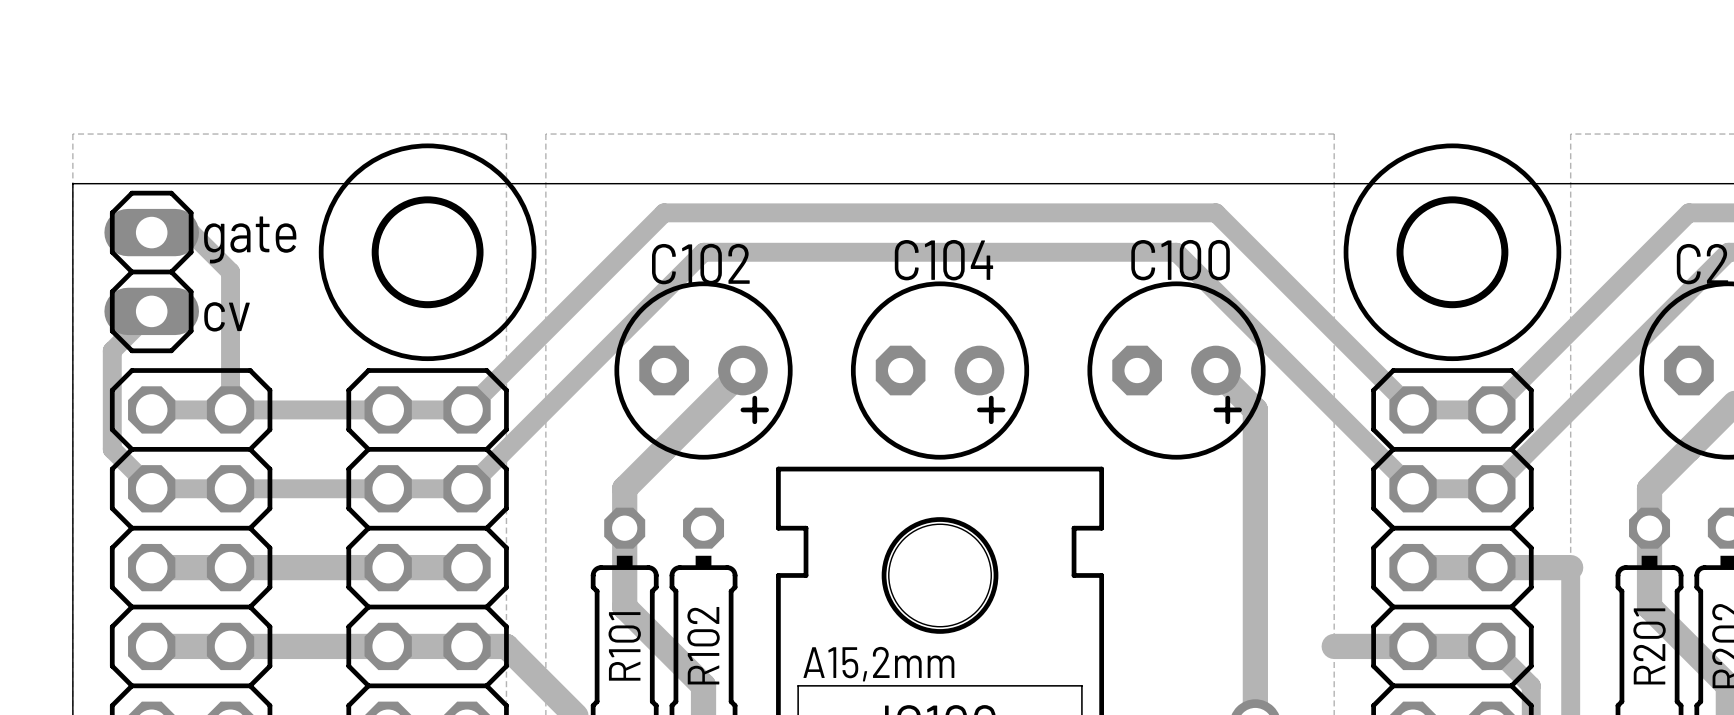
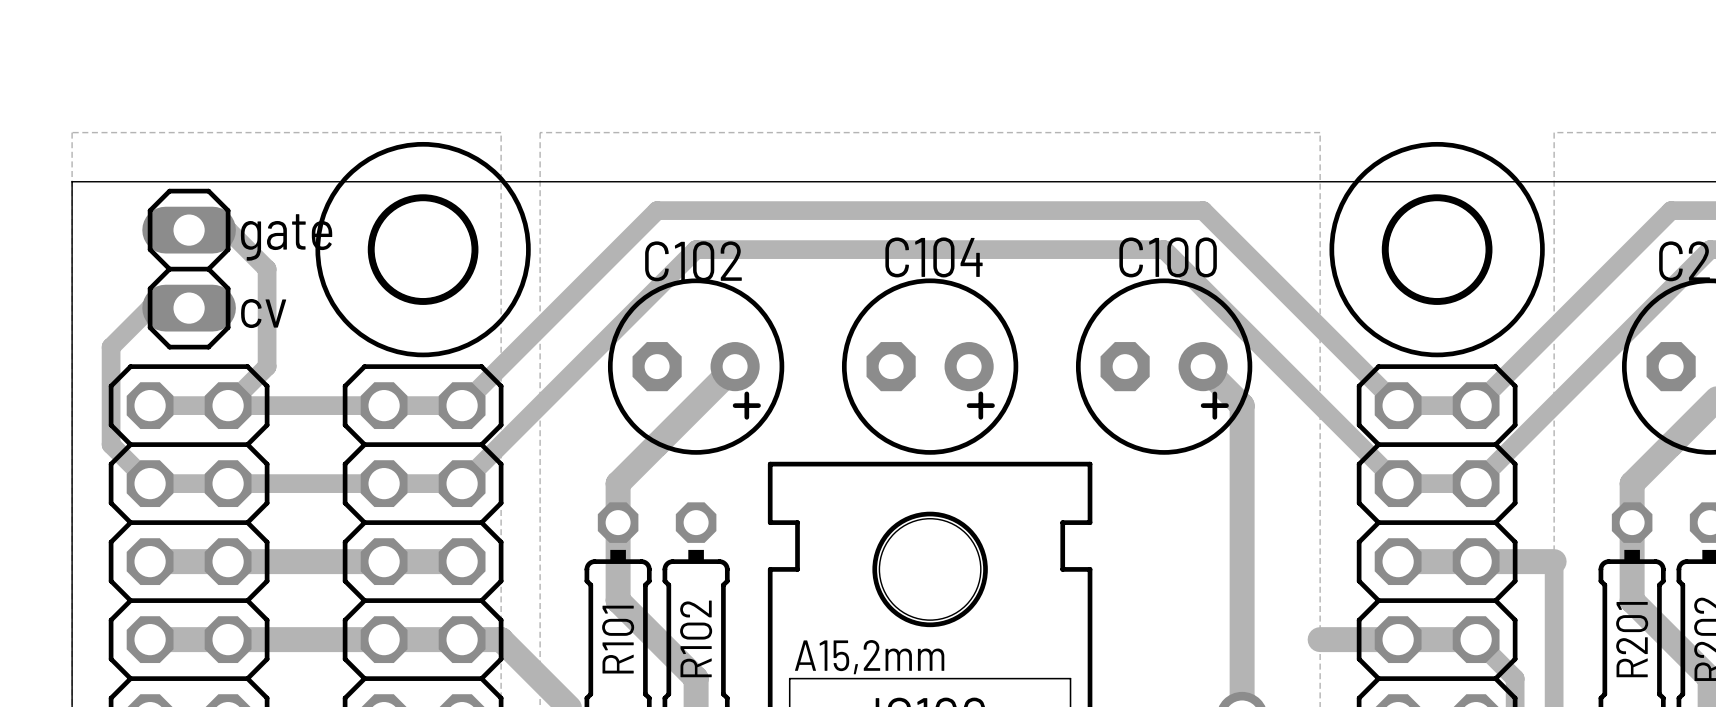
track: (151, 232) (191, 232) (230, 271) (230, 409) -> (189, 230) (228, 230) (267, 269) (267, 366) (228, 405)
text position: gate (250, 239) -> gate (286, 237)
part position: (151, 271) -> (189, 269)
text position: cv (227, 316) -> cv (263, 313)

